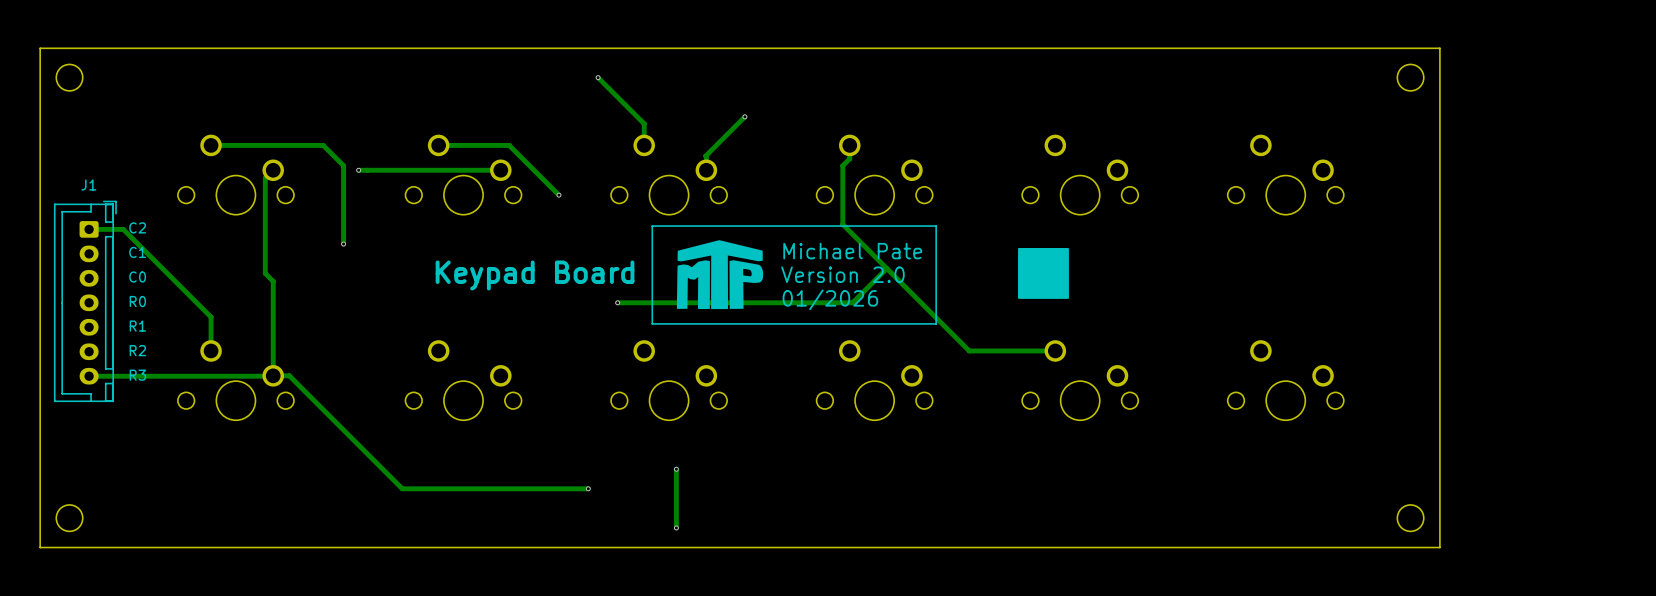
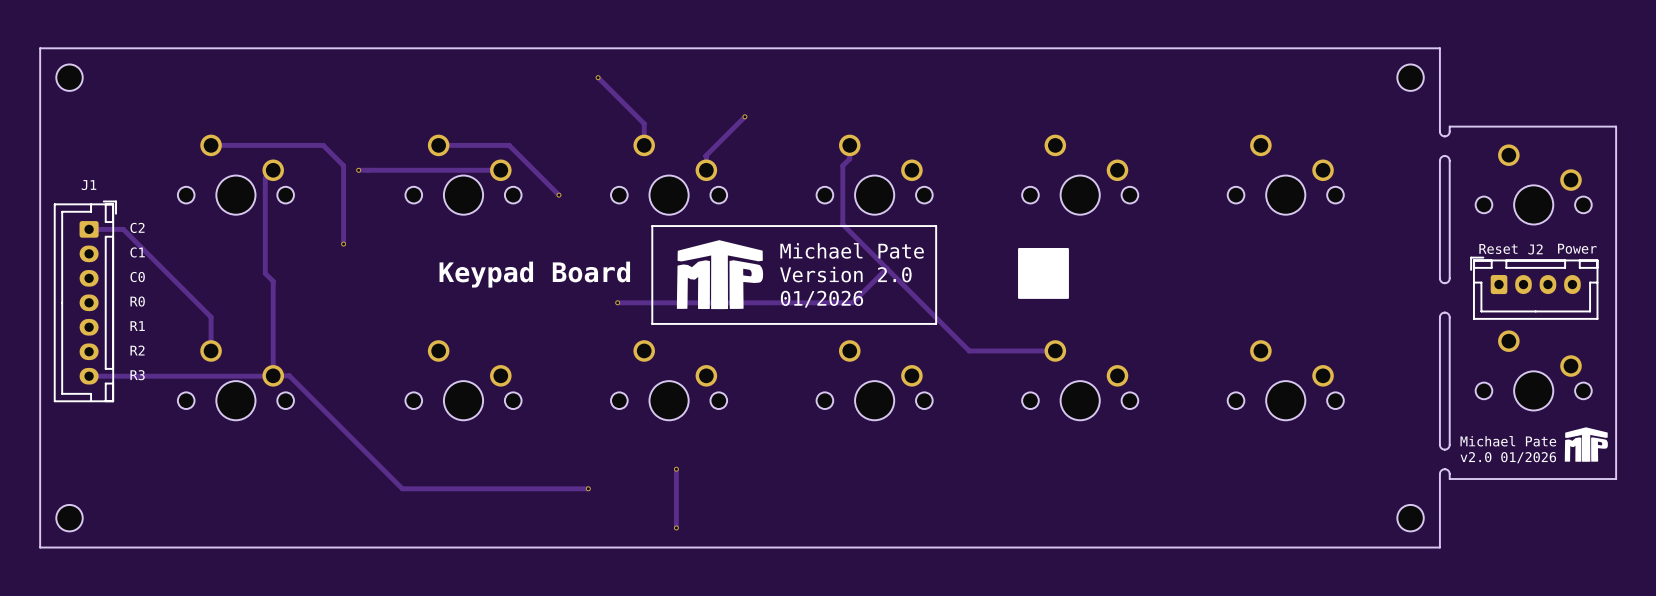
board edge: (1439, 131) (1439, 160) -> (1439, 278) (1444, 283) (1449, 278) (1449, 160) (1444, 155) (1439, 160)
board edge: none -> (1439, 131) (1444, 136) (1449, 133) (1449, 126) (1616, 126) (1616, 479) (1449, 479) (1449, 471) (1444, 469) (1439, 474)
part: none -> (1533, 184)
text: none -> Reset (1498, 249)
text: none -> Power (1577, 248)
board edge: (1439, 278) (1439, 317) -> none
J2: none -> (1534, 288)
part: none -> (1533, 370)
drawing: none -> [1564, 427, 1608, 462]
text: none -> Michael Pate (1508, 441)
board edge: (1439, 444) (1439, 474) -> (1439, 444) (1444, 449) (1449, 444) (1449, 316) (1444, 312) (1439, 317)
text: none -> v2.0 01/2026 (1508, 457)

